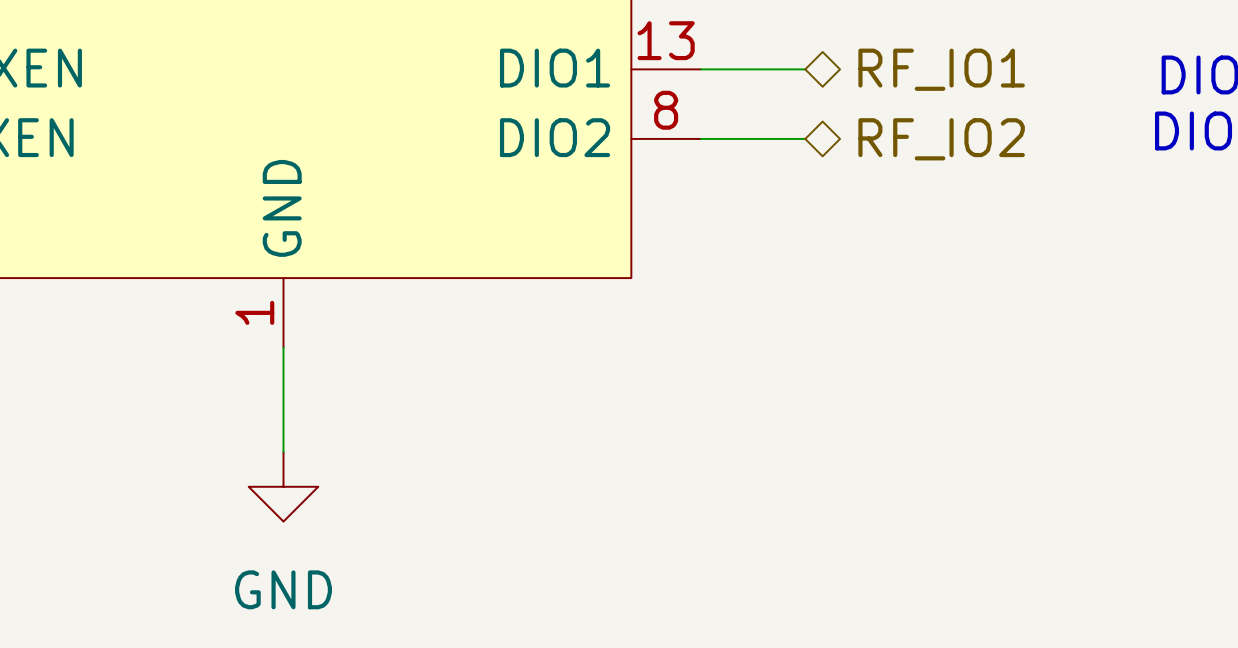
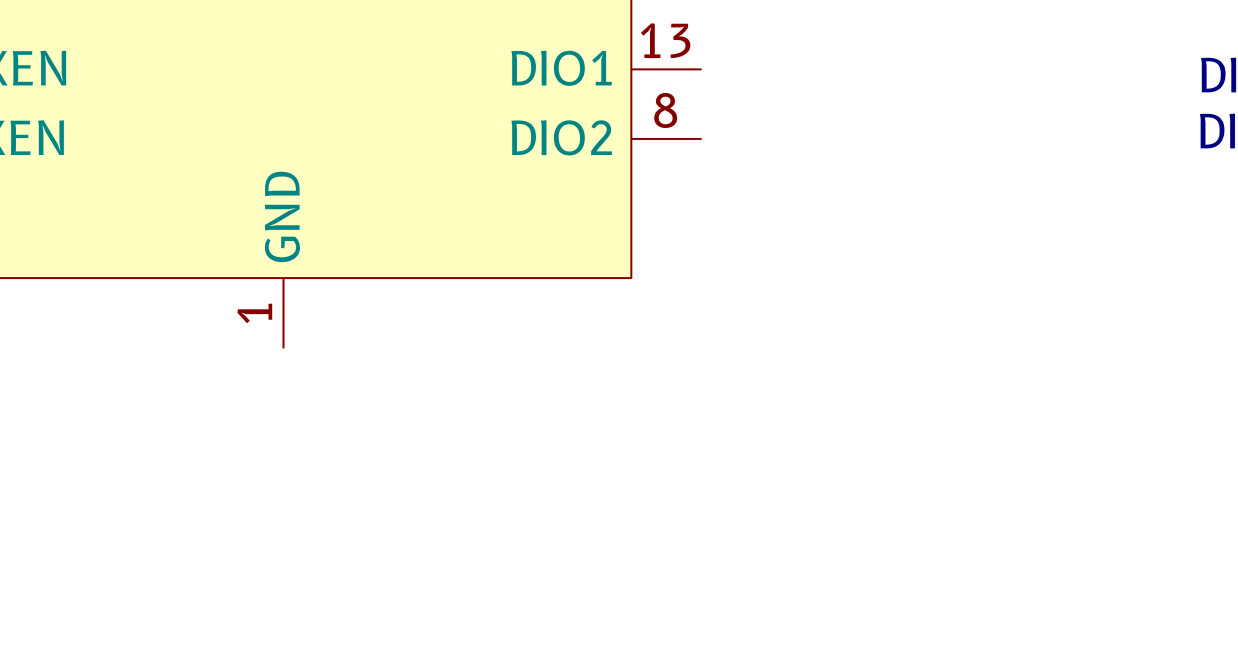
wire: (700, 69) (805, 69) -> none
hierarchical label: RF_IO1 (941, 69) -> none
wire: (700, 138) (805, 138) -> none
hierarchical label: RF_IO2 (941, 139) -> none
wire: (283, 347) (283, 452) -> none
power symbol: GND (283, 486) -> none

